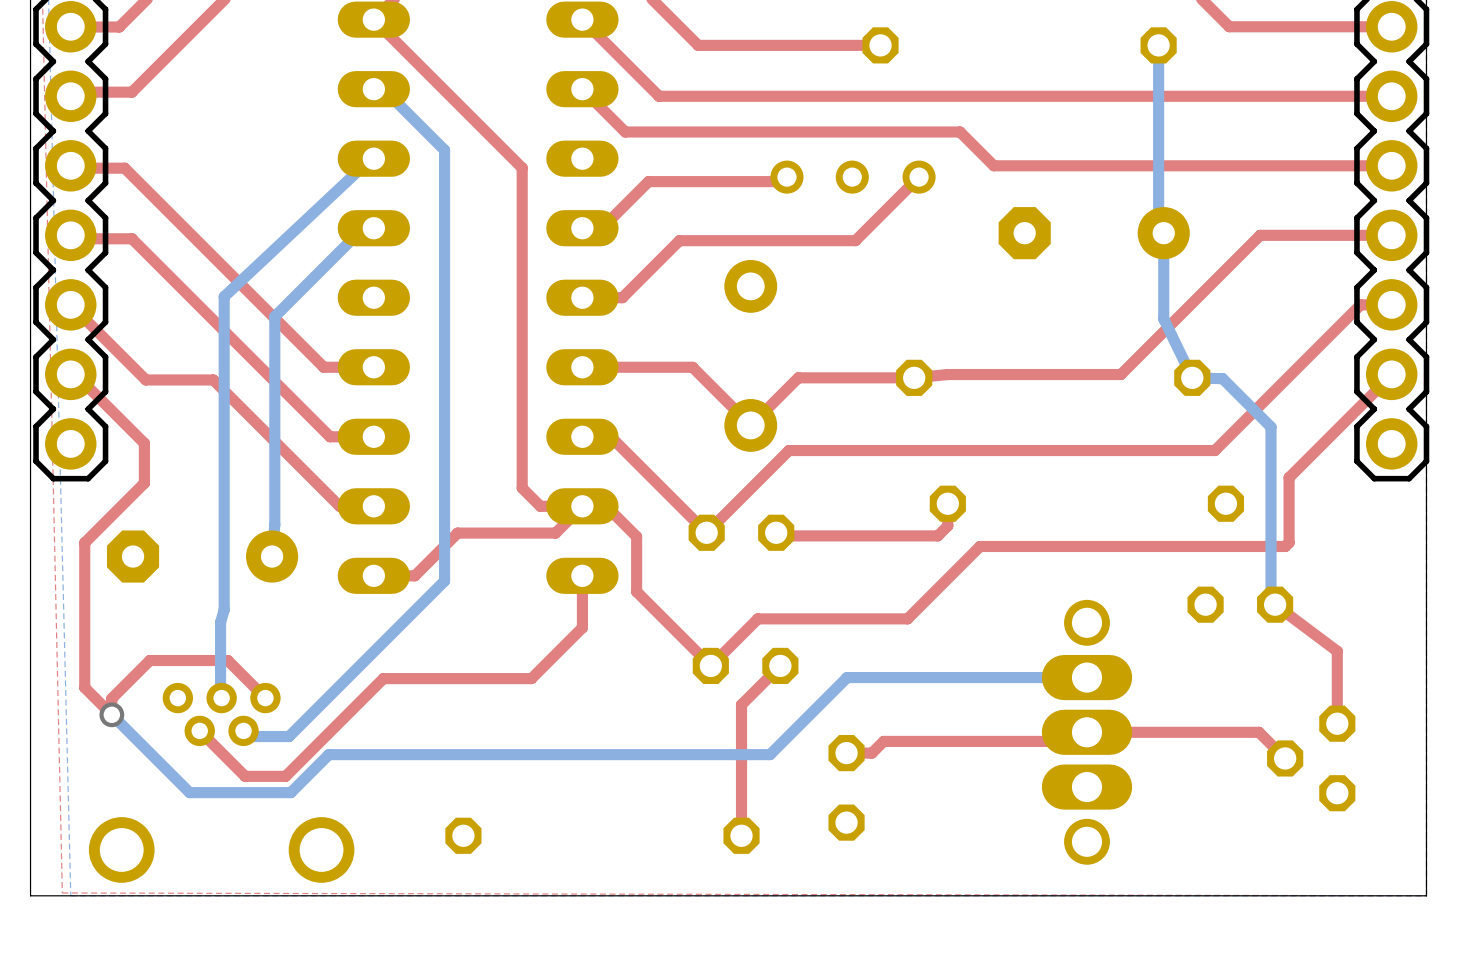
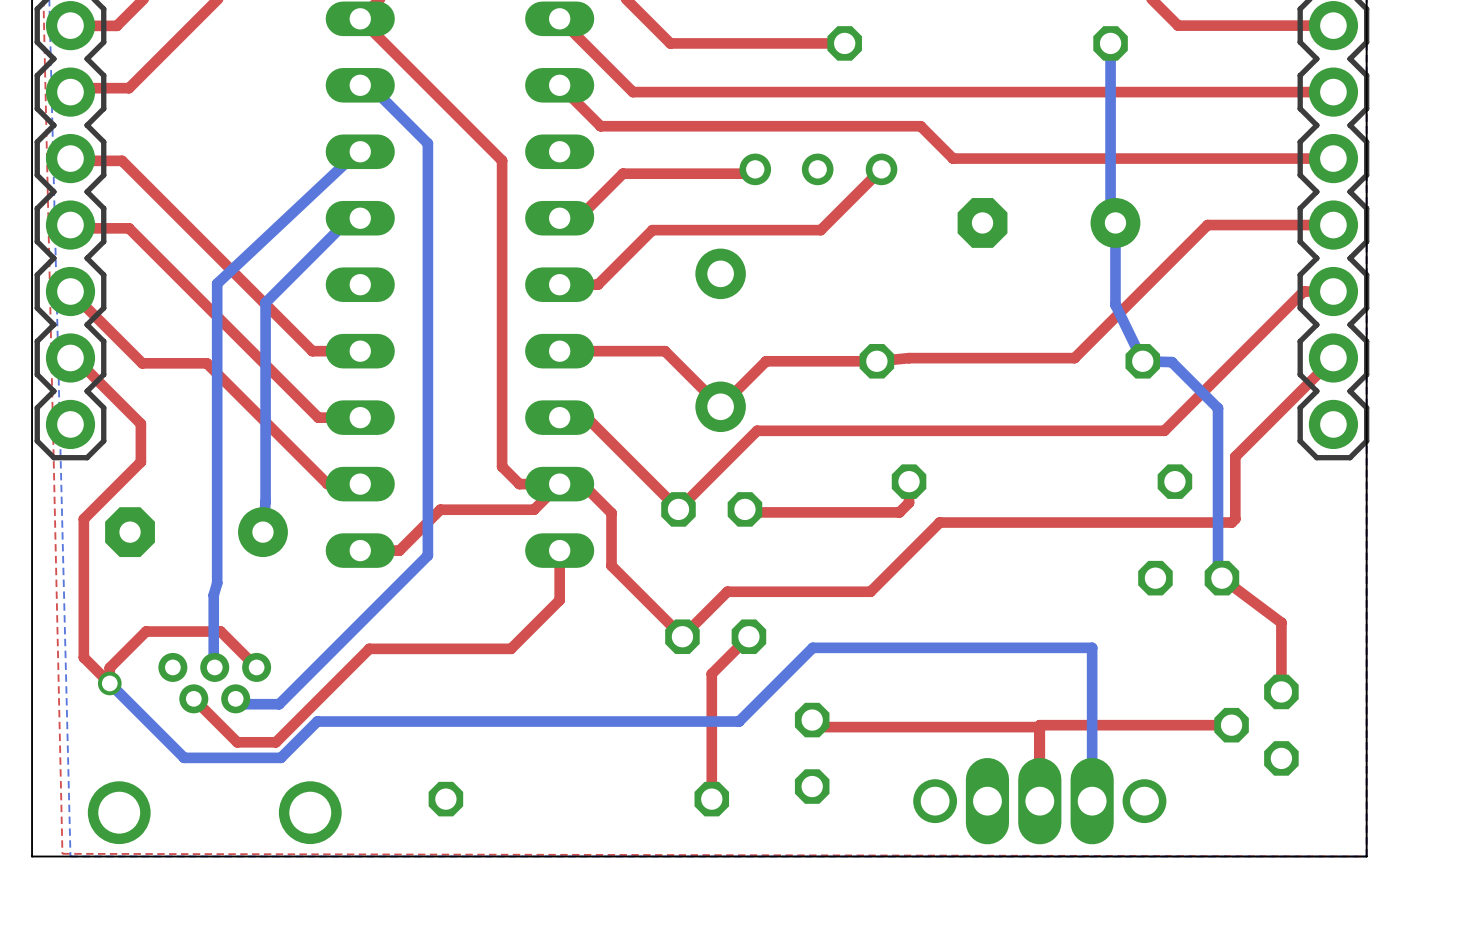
bottom track: none -> (1042, 647) (1092, 647) (1092, 801)
part rotation: 0° (1086, 732) -> 90° clockwise (1039, 801)
top track: (846, 753) (871, 753) (883, 741) (1077, 741) (1086, 732) (1259, 732) (1285, 758) -> (812, 720) (812, 727) (1039, 727)
top track: none -> (1231, 725) (1039, 725) (1039, 801)

